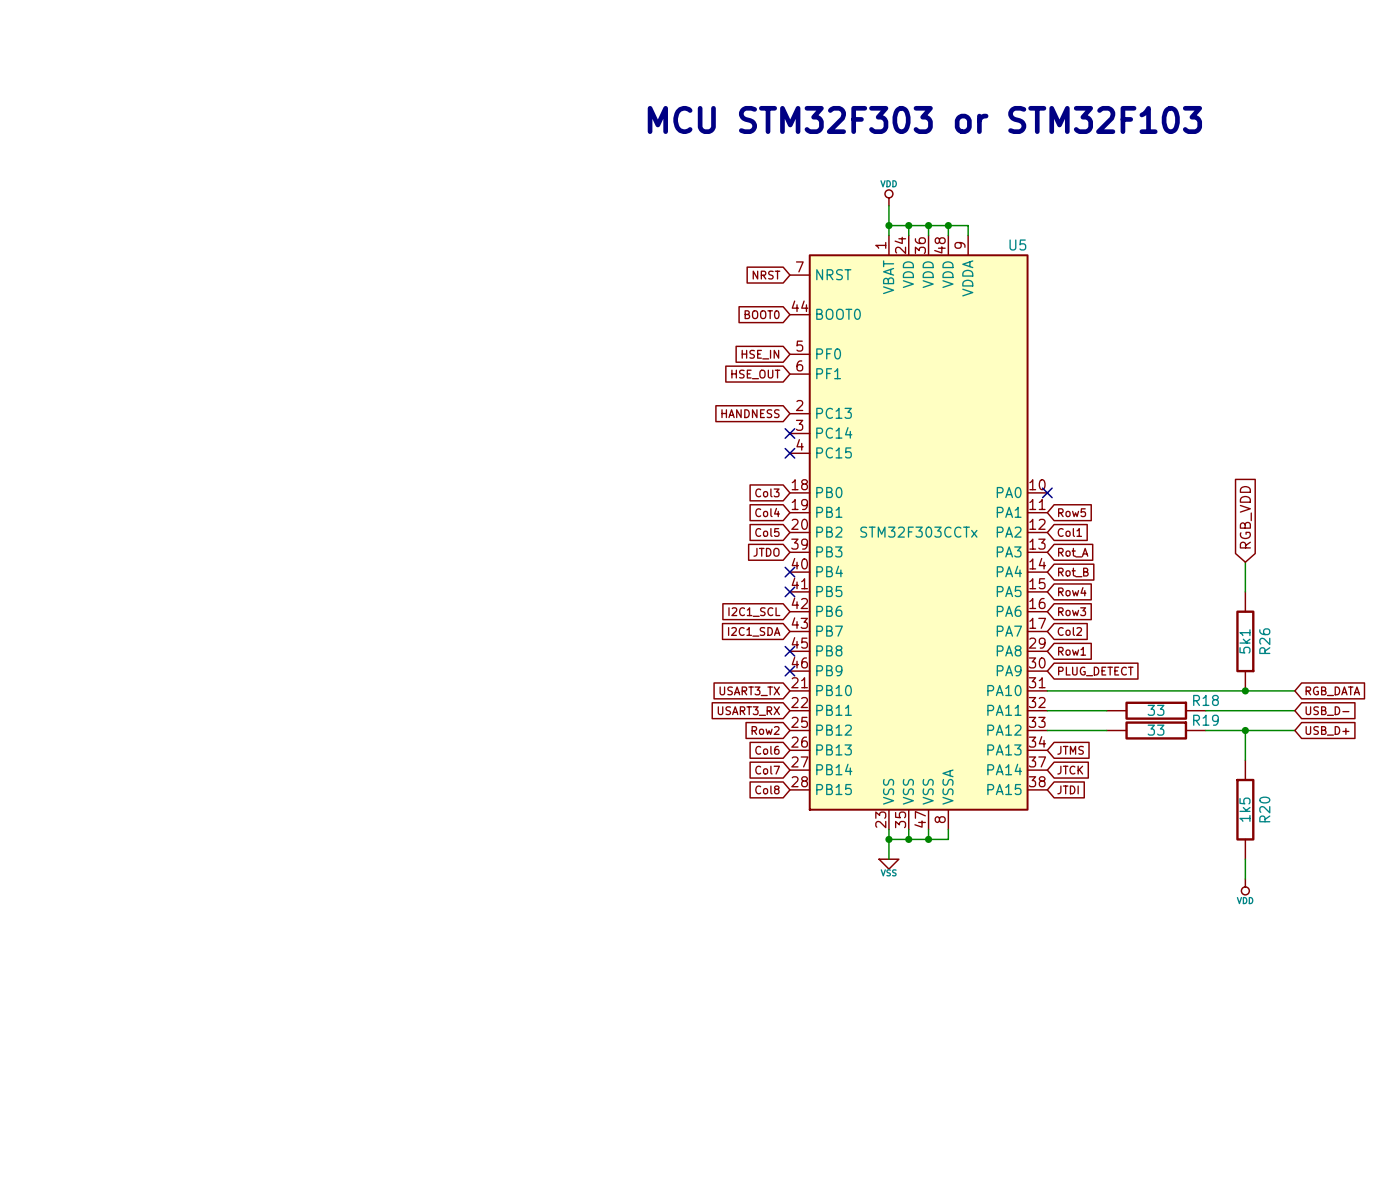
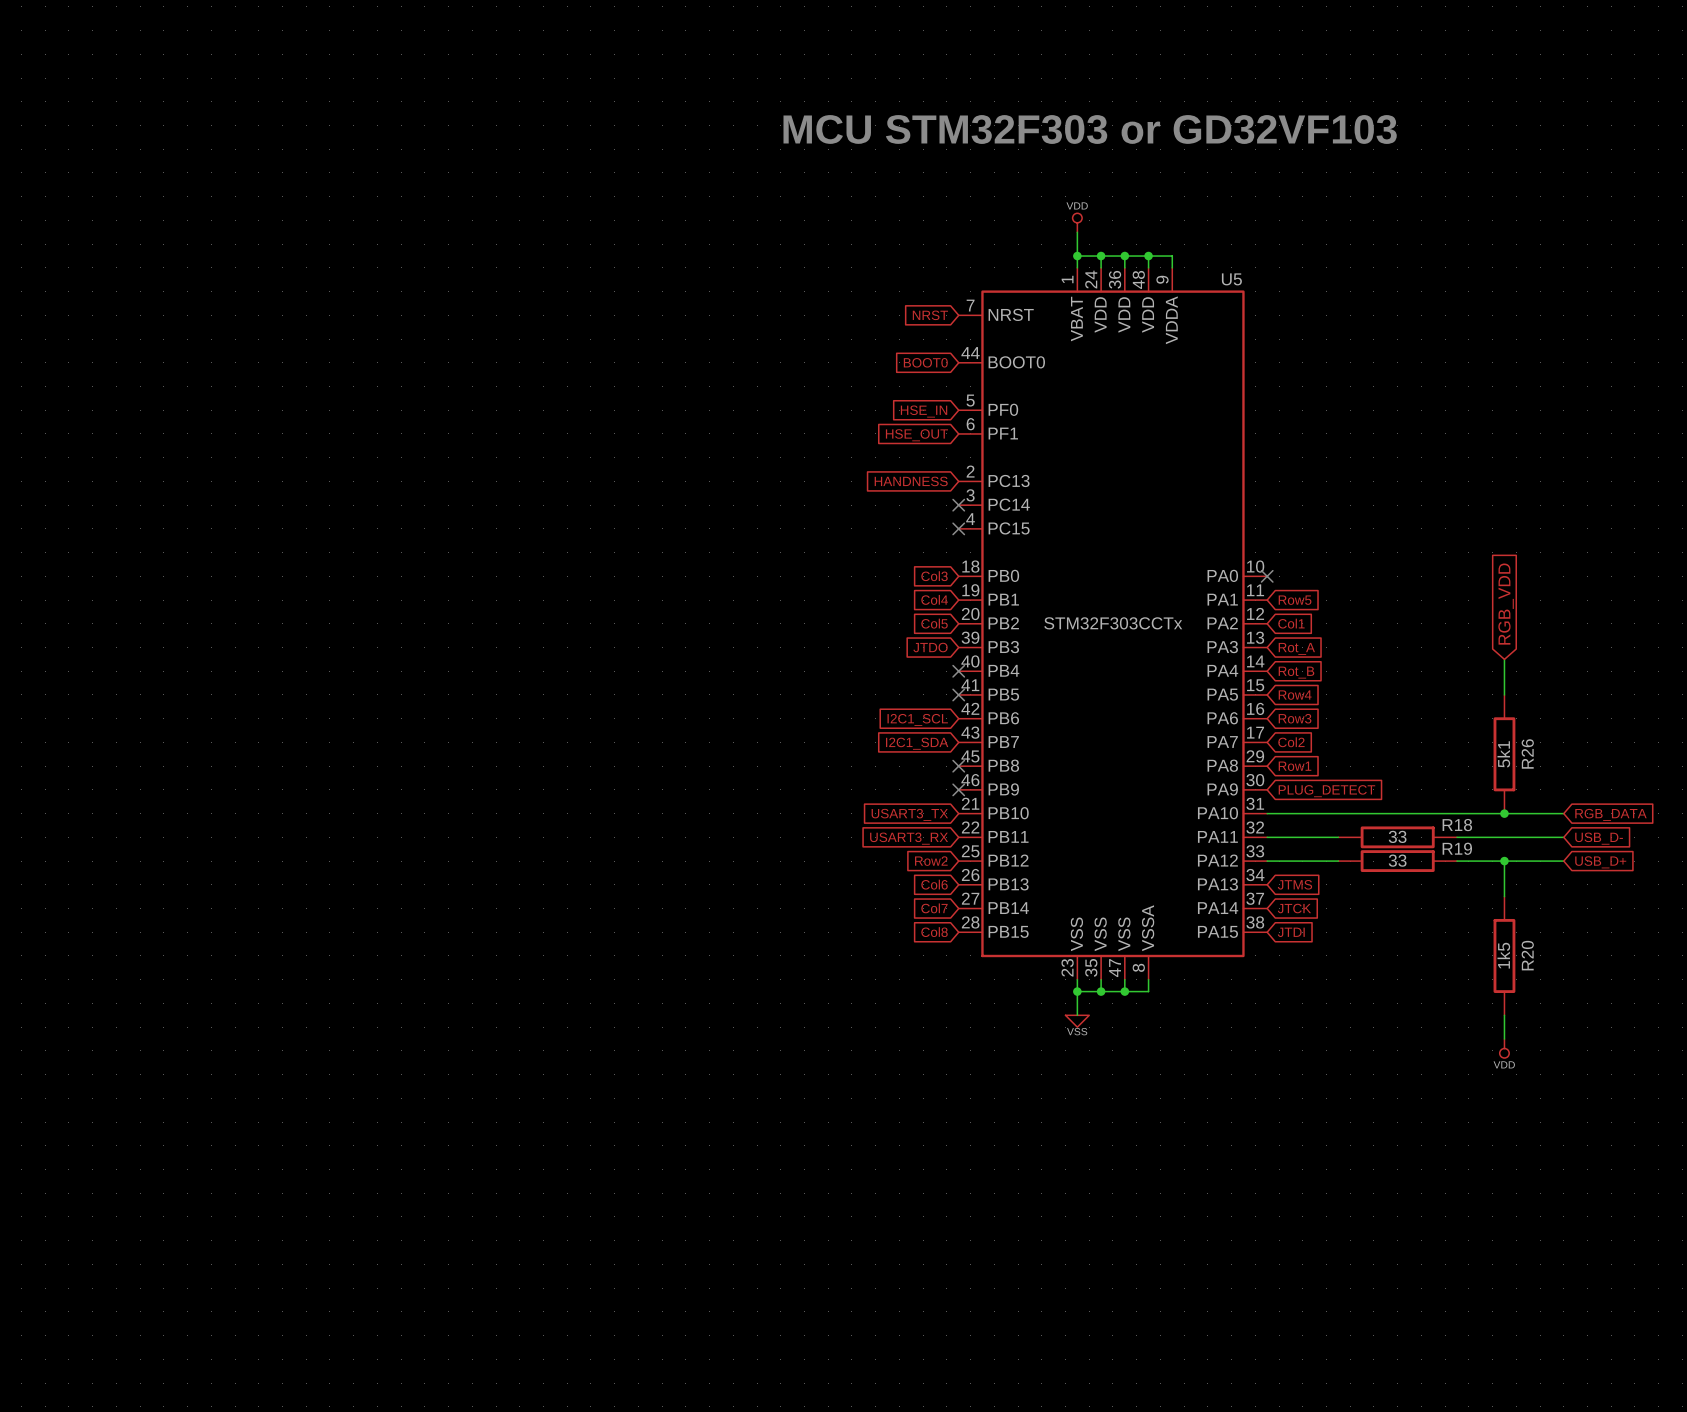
text: MCU STM32F303 or STM32F103 (924, 119) -> MCU STM32F303 or GD32VF103 (1090, 129)

